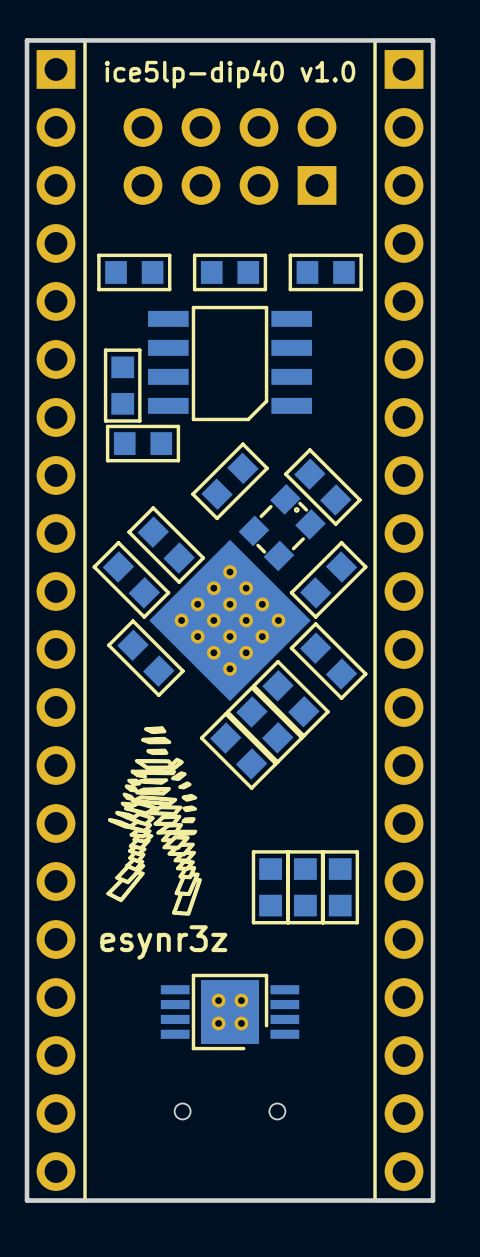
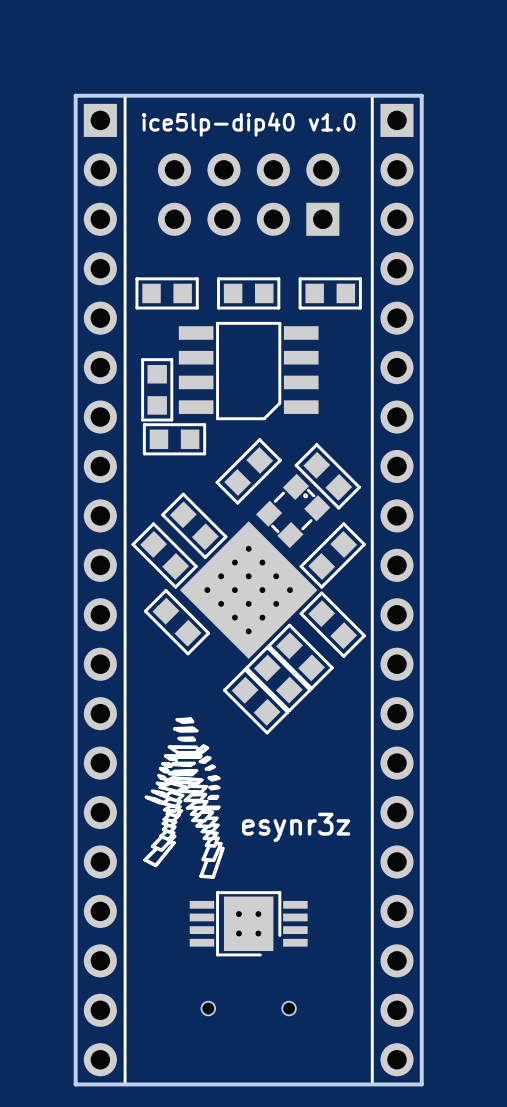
drawing position: (154, 820) -> (184, 798)
part: (270, 887) -> none
part: (305, 887) -> none
part: (340, 887) -> none
text position: esynr3z (163, 942) -> esynr3z (296, 827)

